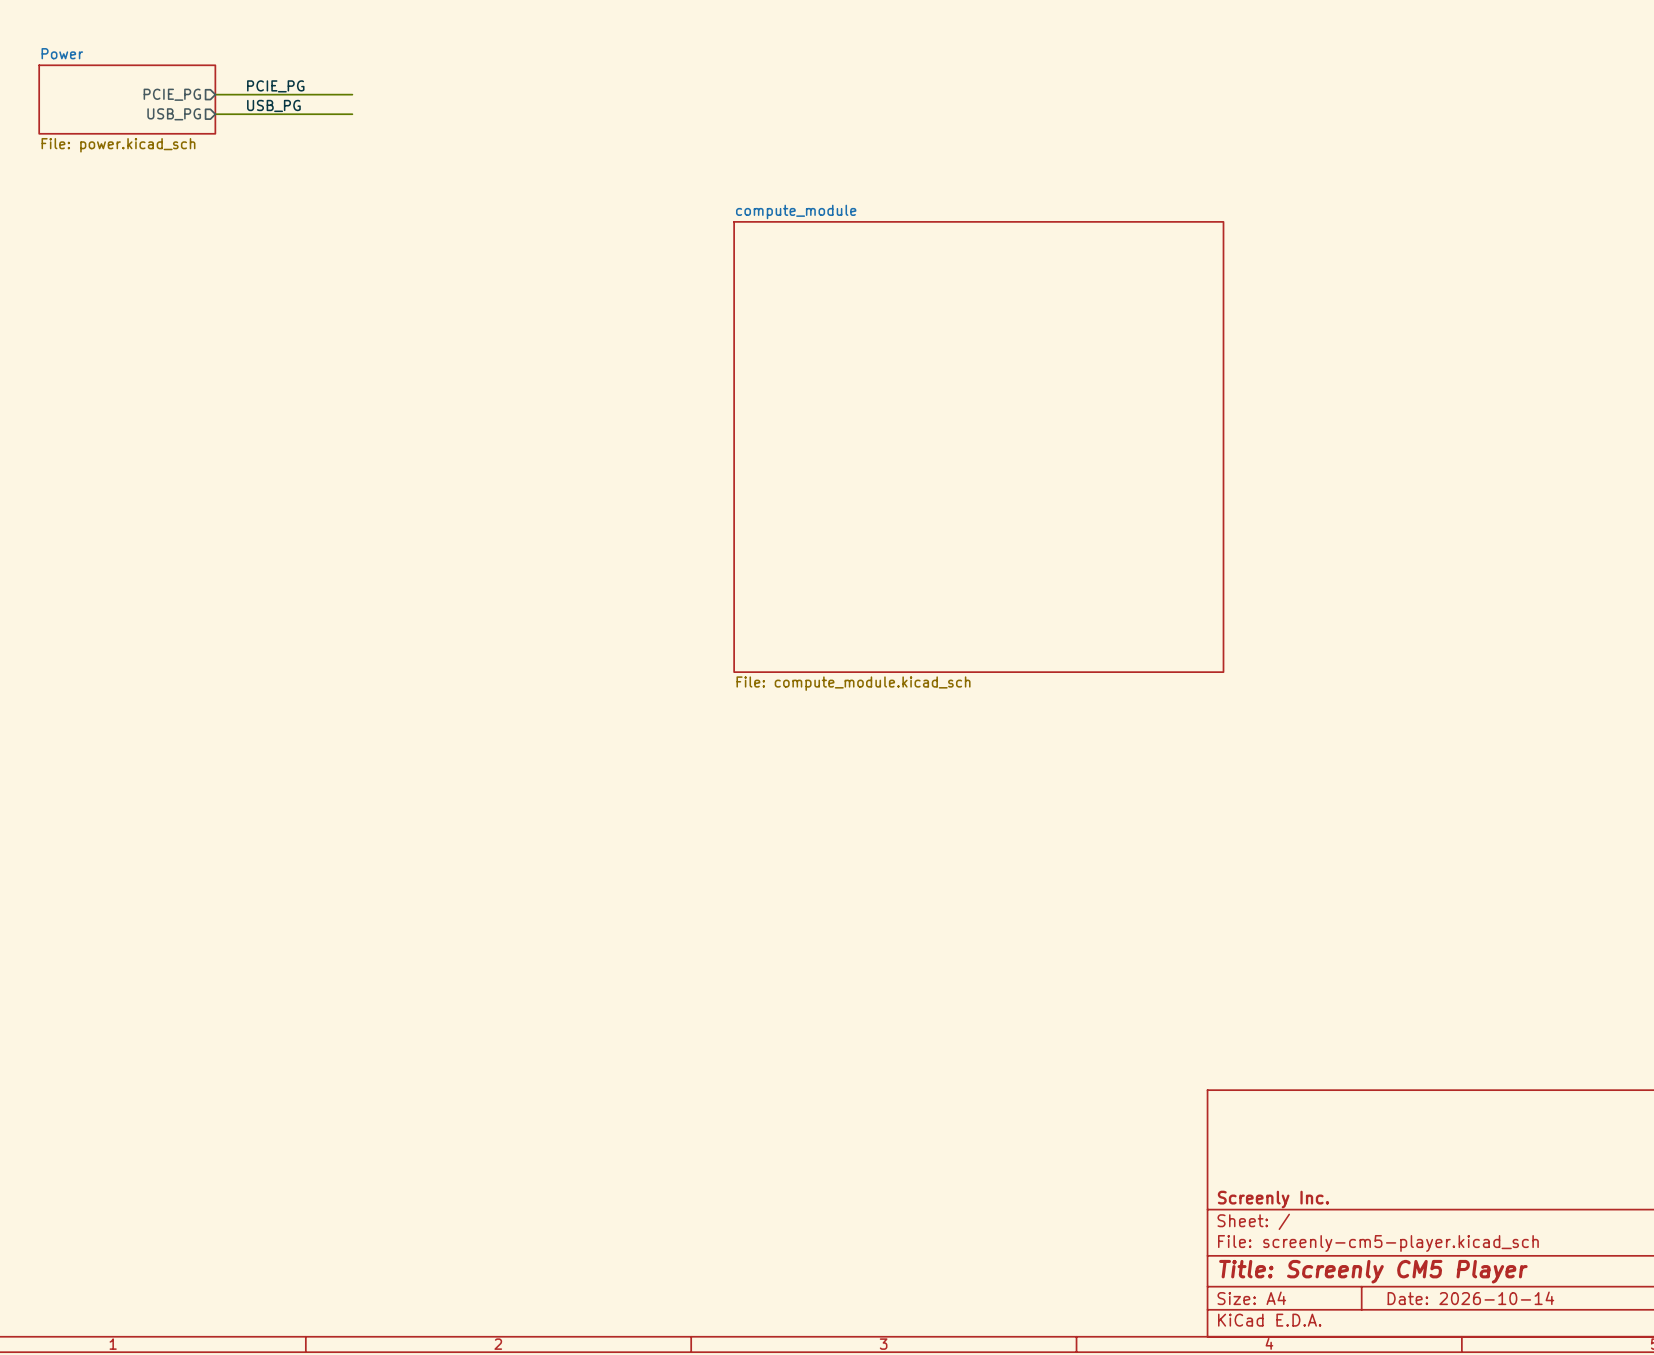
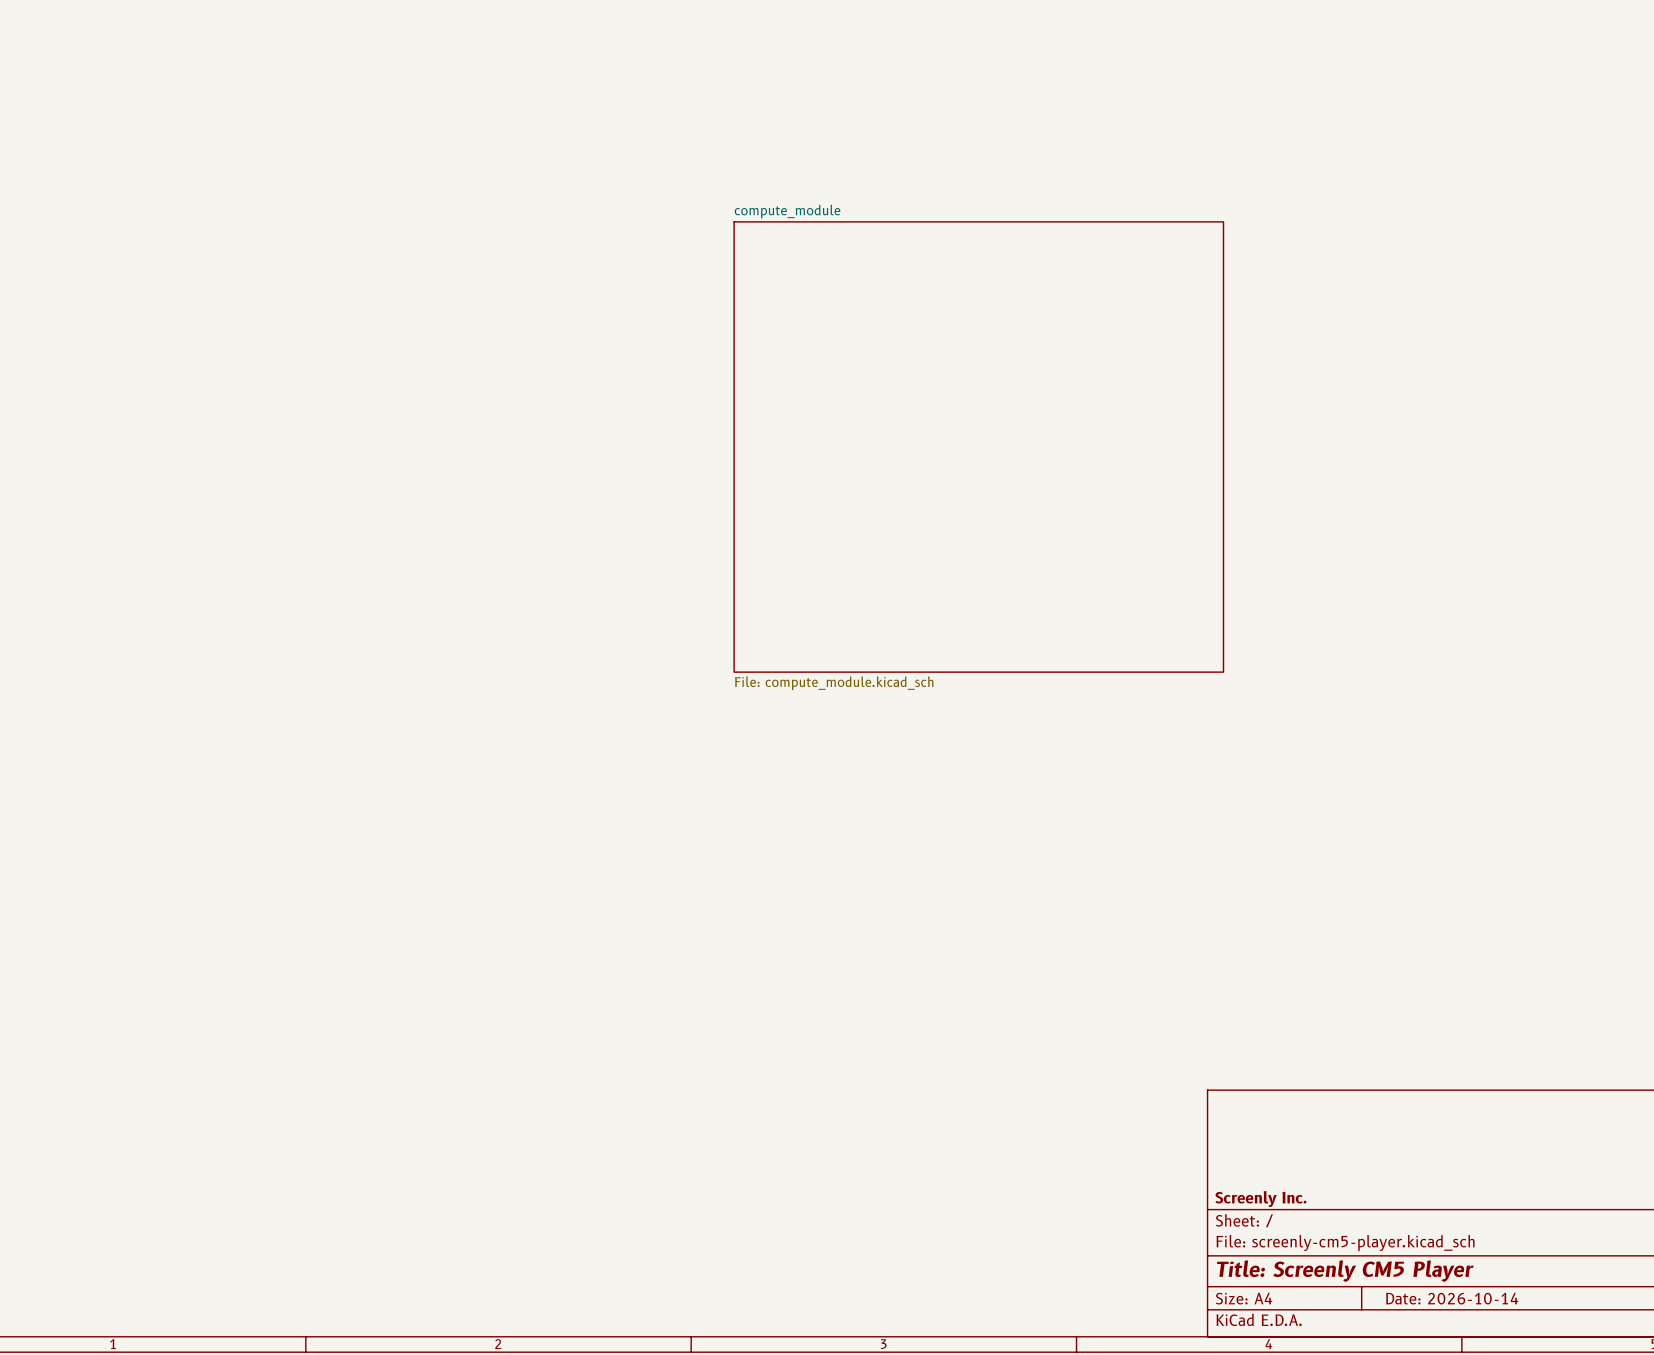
label: PCIE_PG (275, 86) -> none
sheet pin: PCIE_PG (172, 94) -> none
wire: (215, 94) (352, 94) -> none
sheet Power: File: power.kicad_sch (127, 99) -> none
label: USB_PG (273, 105) -> none
sheet pin: USB_PG (174, 114) -> none
wire: (215, 114) (352, 114) -> none

